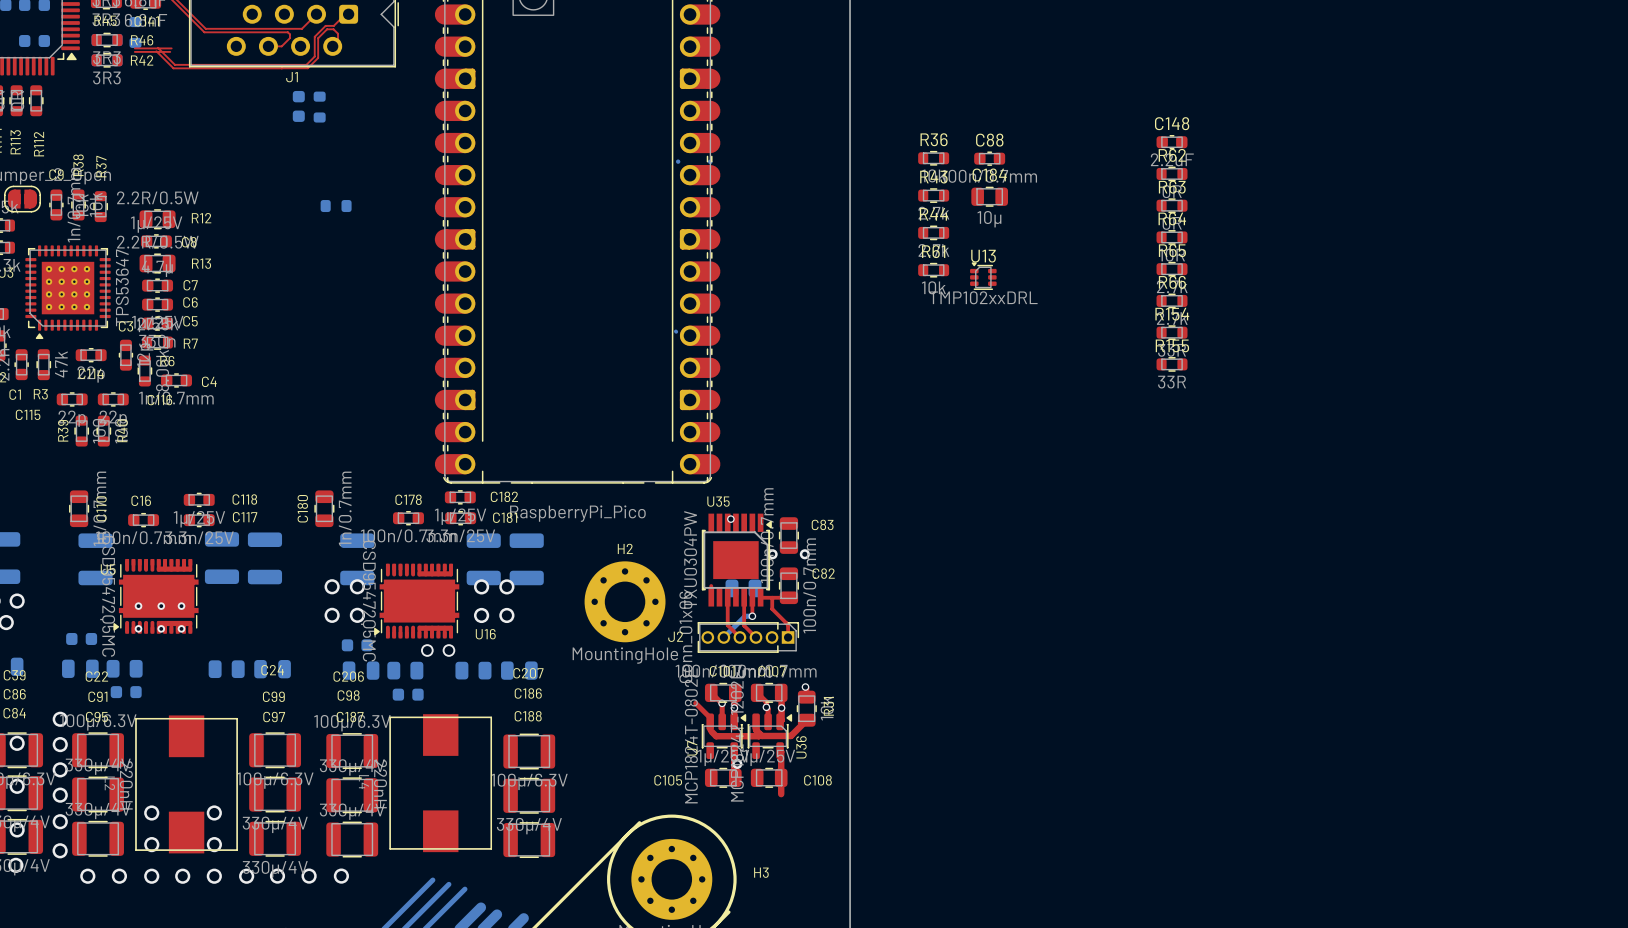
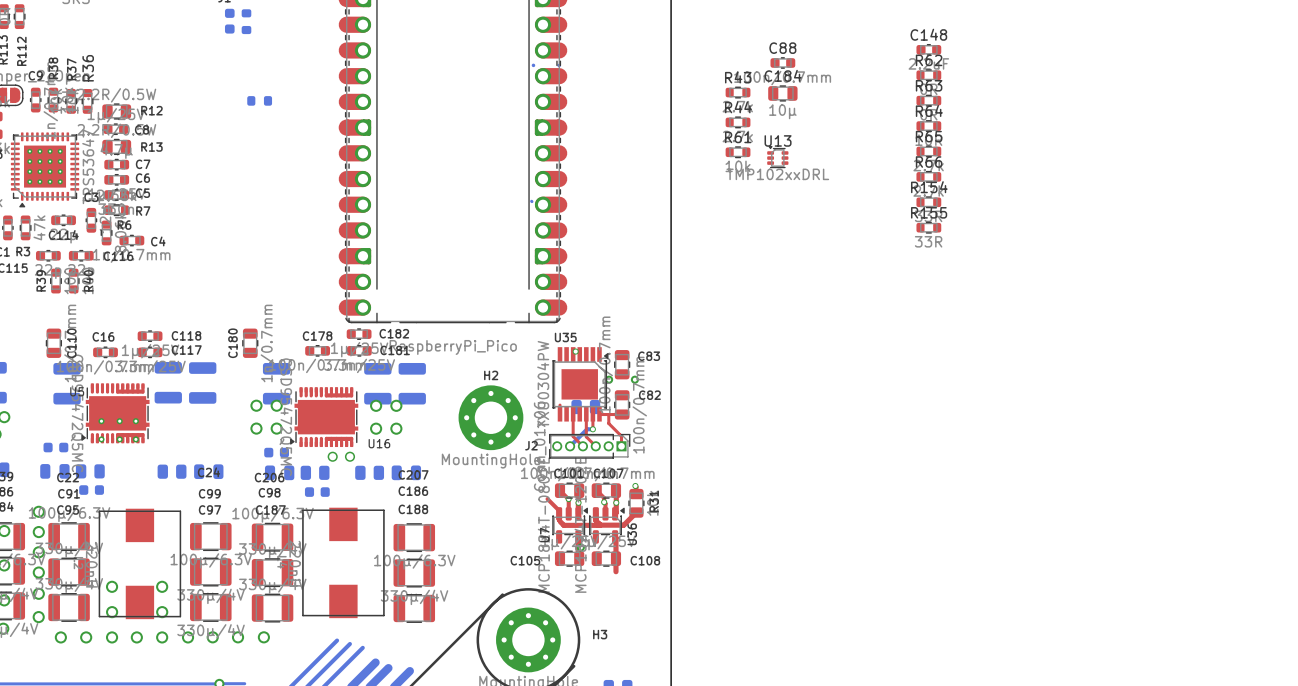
R36 rotation: 0° (933, 158) -> 90° clockwise (87, 101)
R36 position: (933, 158) -> (87, 101)

